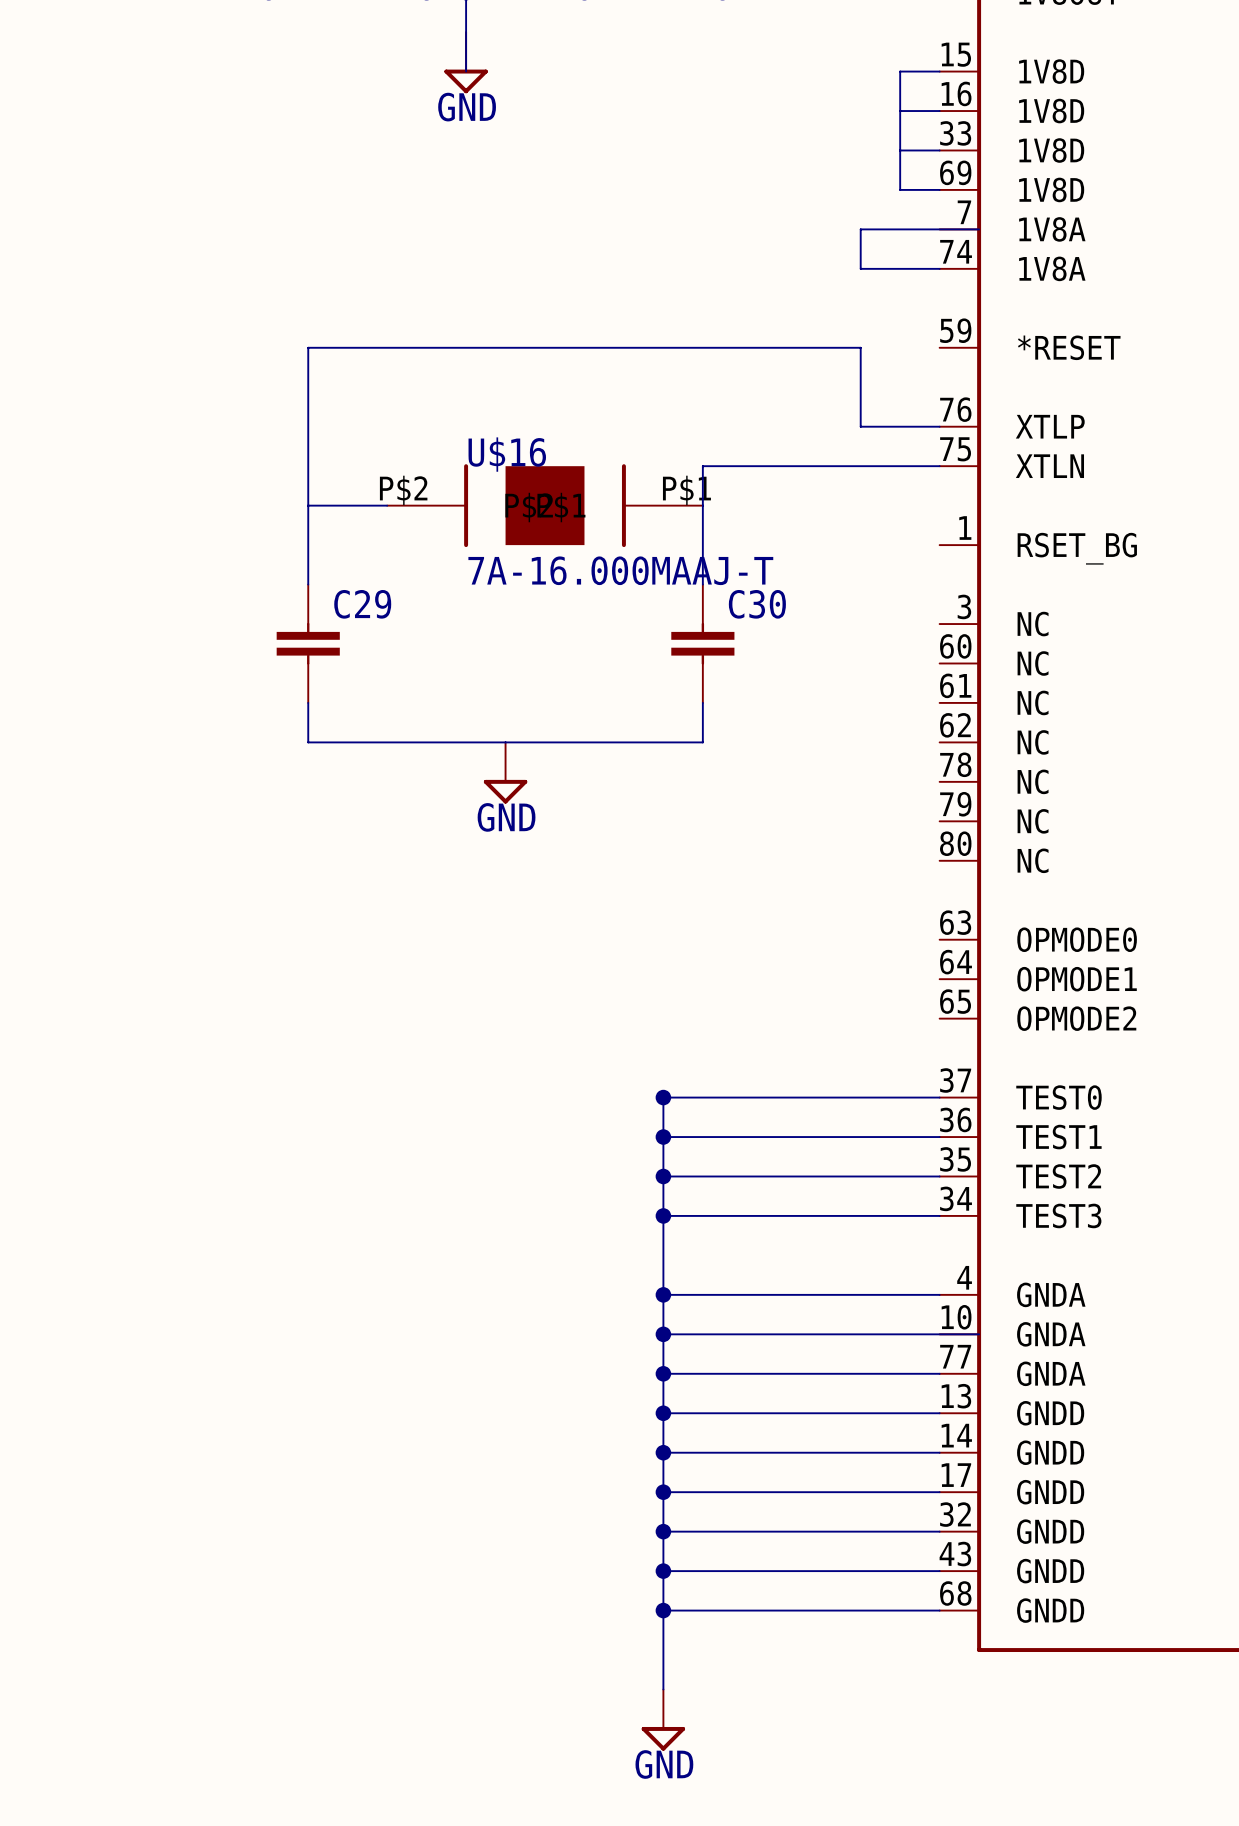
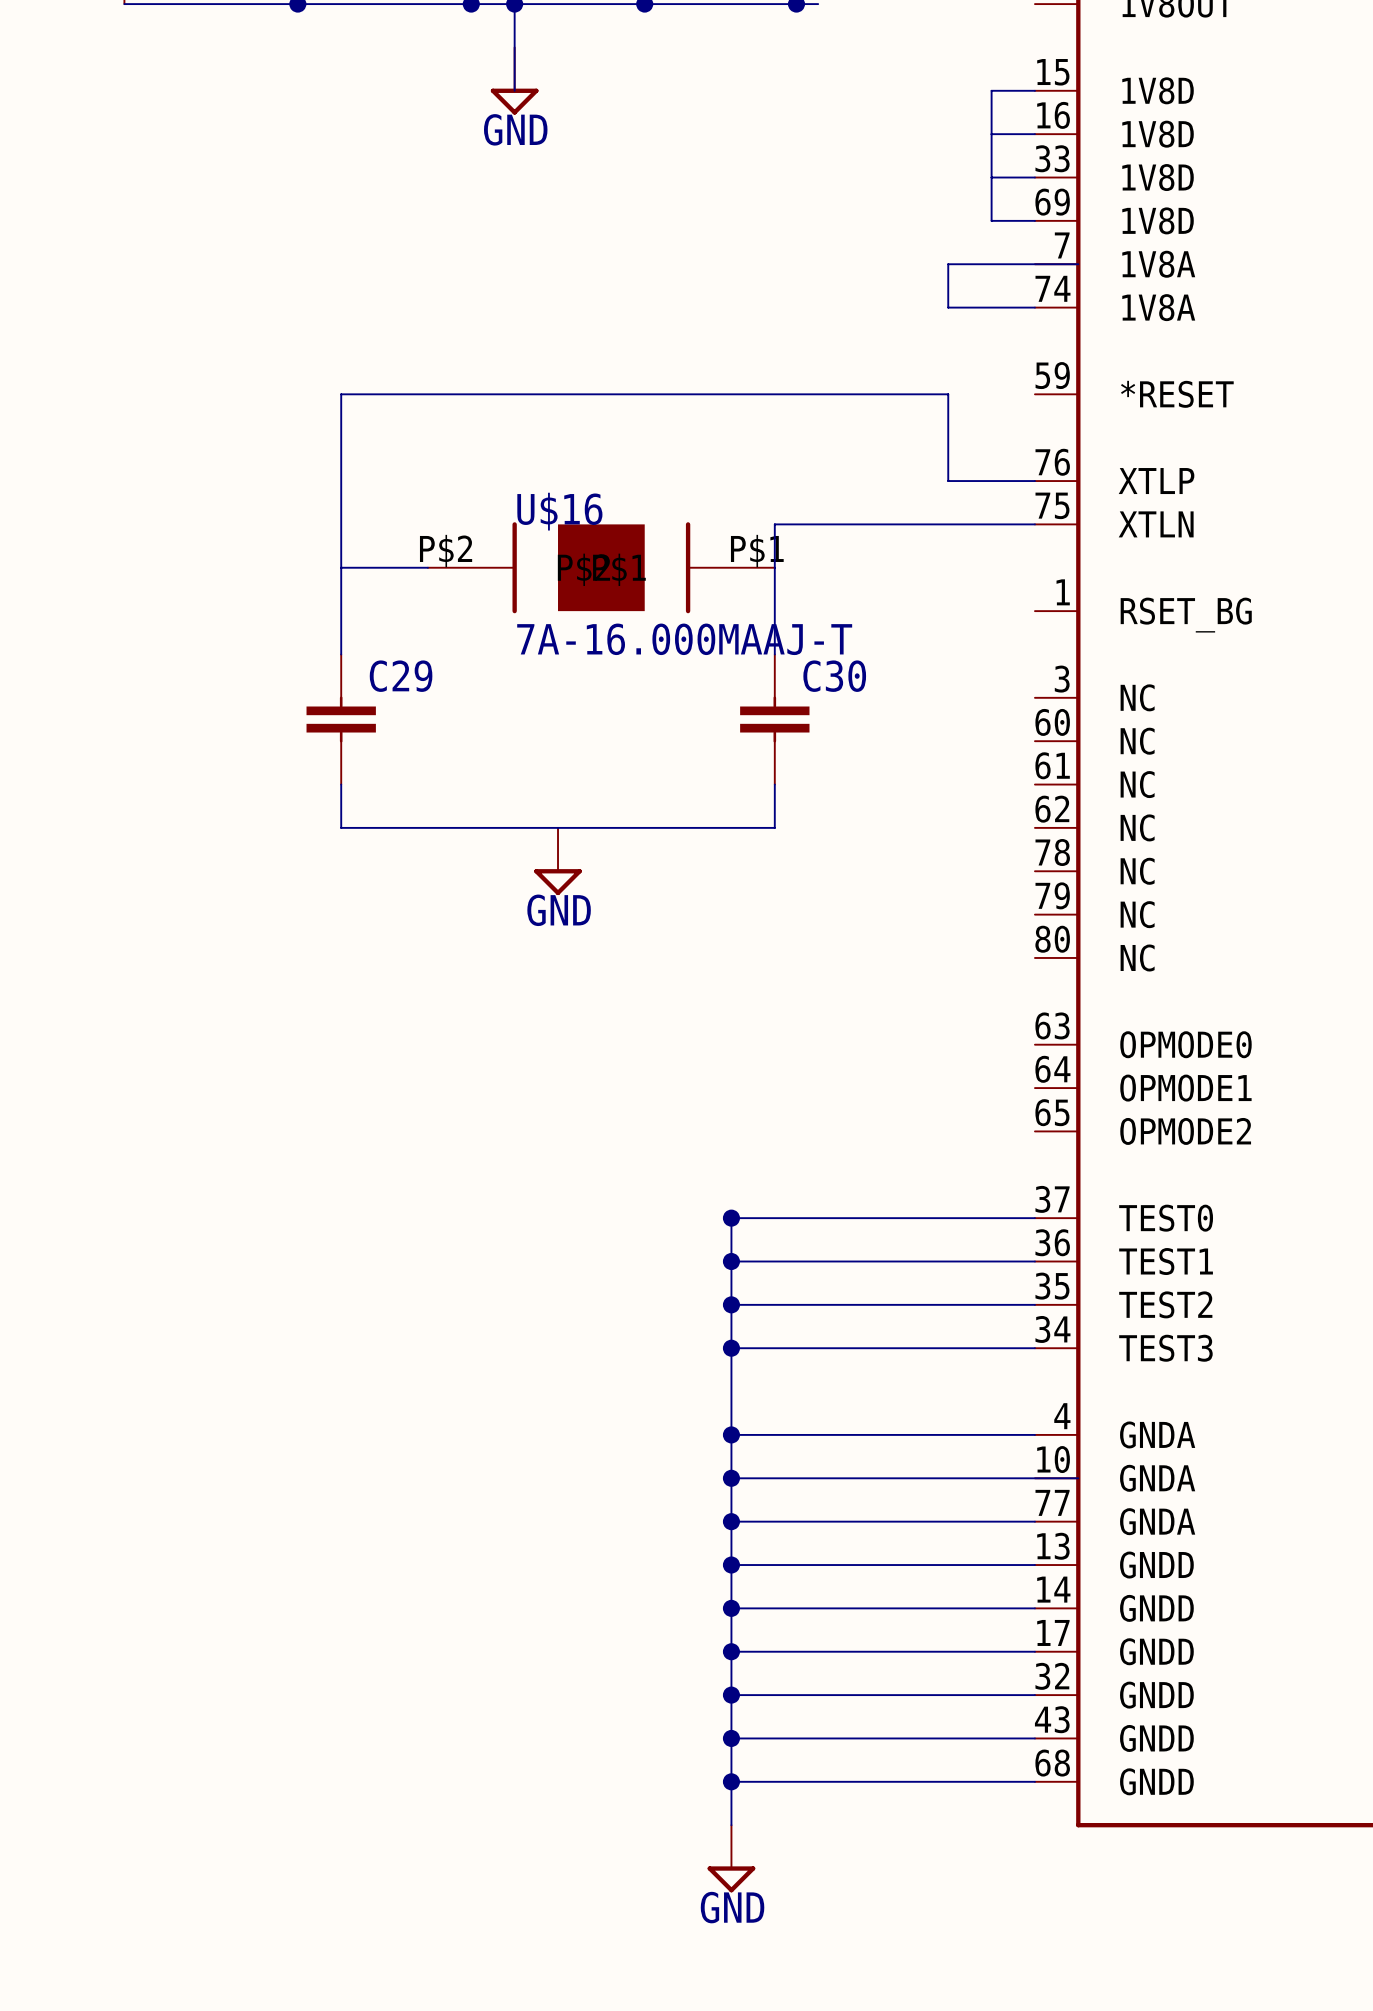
power symbol position: GND (663, 1720) -> GND (731, 1858)

